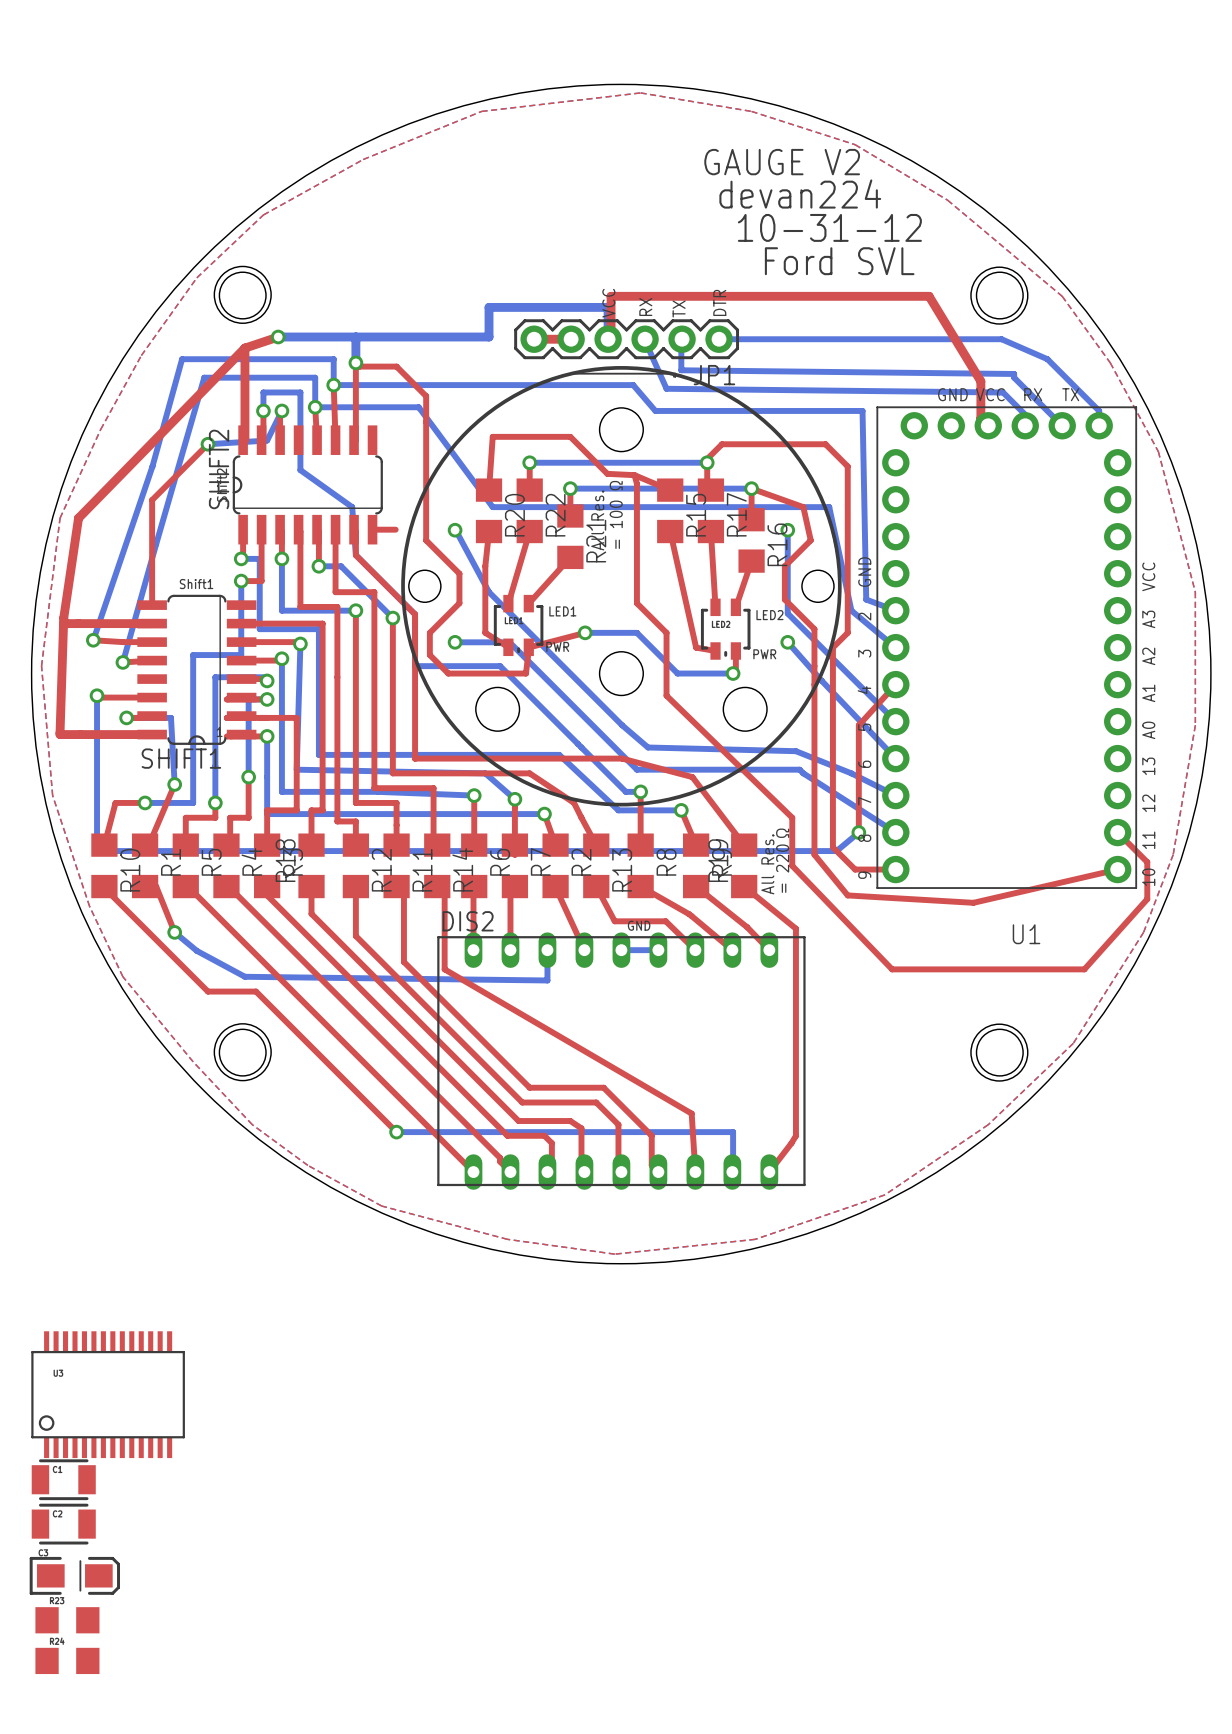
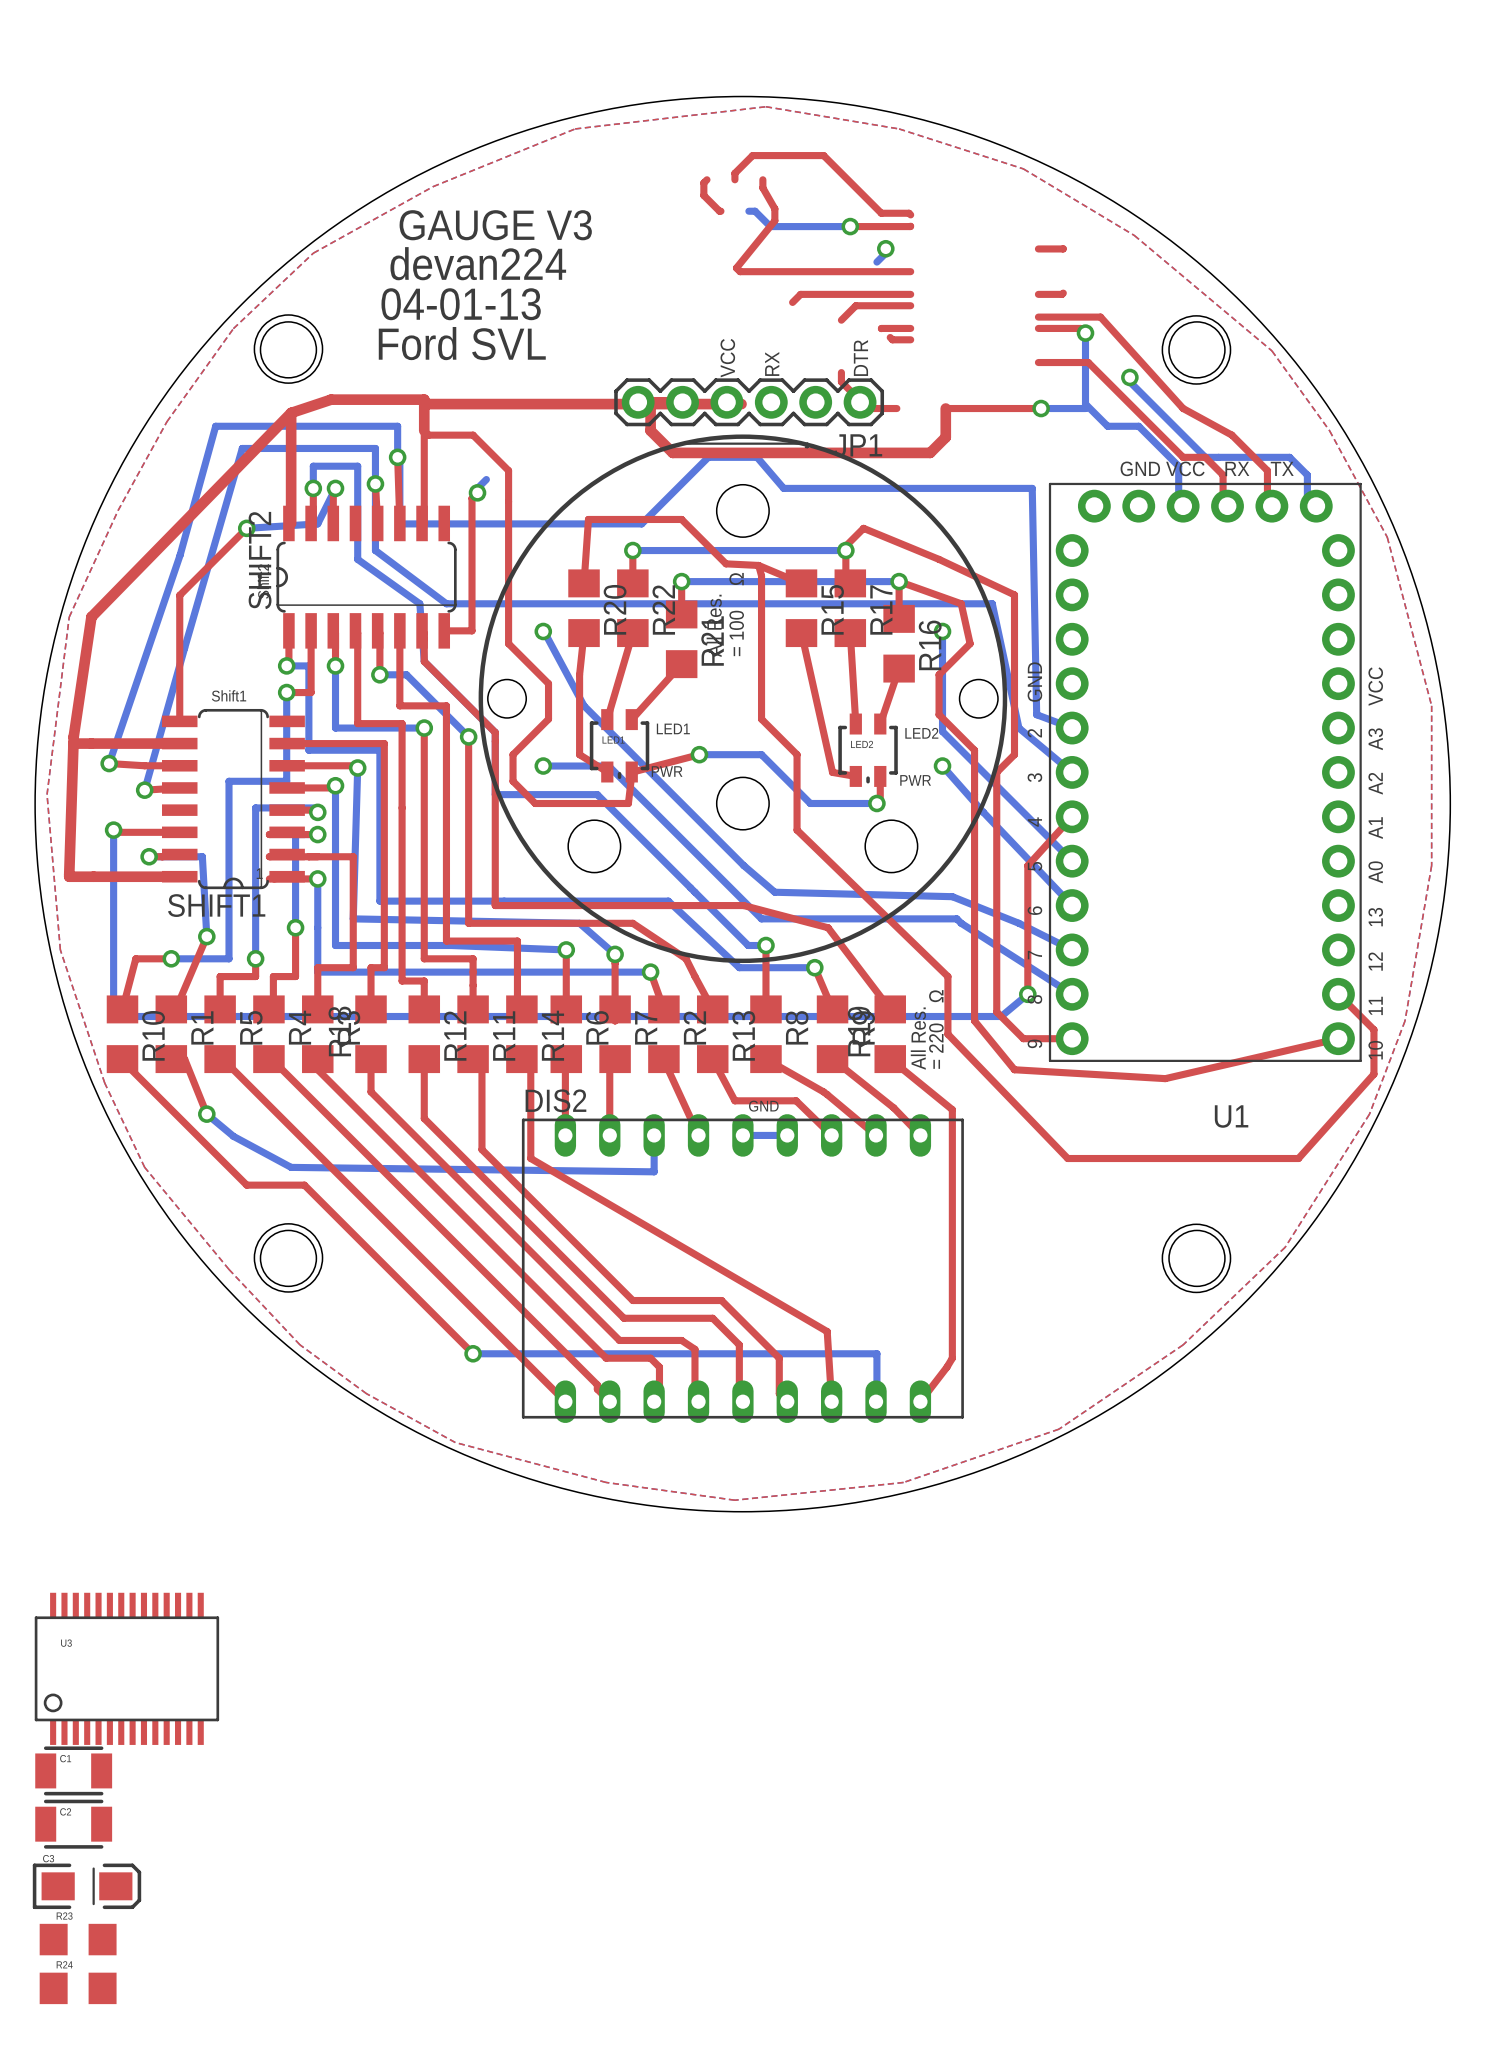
top track: none -> (706, 179) (703, 182) (703, 195) (720, 211)
top track: none -> (734, 179) (734, 173) (752, 155) (823, 155) (881, 213) (909, 213) (910, 214)
top track: none -> (762, 179) (762, 187) (774, 208) (774, 220) (736, 268) (740, 271) (910, 271)
text: GAUGE V2 (782, 162) -> none
bottom track: none -> (748, 211) (755, 211) (770, 226) (850, 226)
text: none -> GAUGE V3 (495, 225)
via: none -> (850, 226)
top track: none -> (910, 226) (850, 226)
text: devan224 (800, 194) -> none
bottom track: none -> (885, 248) (885, 253) (876, 262)
via: none -> (885, 248)
top track: none -> (1038, 248) (1063, 248)
text: none -> devan224 (478, 263)
text: 10-31-12 (829, 227) -> none
top track: none -> (1063, 293) (1038, 294)
top track: none -> (910, 294) (800, 294) (792, 302)
text: none -> 04-01-13 (461, 304)
top track: none -> (910, 305) (855, 305) (841, 320)
text: Ford SVL (839, 261) -> none
top track: none -> (1038, 317) (1100, 317) (1183, 408) (1231, 435) (1267, 470) (1267, 501) (1271, 506)
top track: none -> (881, 328) (910, 328)
top track: none -> (1038, 328) (1080, 328) (1085, 333)
bottom track: none -> (1085, 333) (1085, 408) (1041, 408)
via: none -> (1085, 333)
top track: none -> (890, 337) (892, 339) (910, 339)
text: none -> Ford SVL (462, 343)
top track: none -> (1038, 362) (1088, 362) (1183, 457) (1205, 457) (1223, 475) (1223, 501) (1227, 506)
text: TX (679, 309) -> none
top track: none -> (841, 372) (841, 381) (868, 408) (896, 408)
via: none -> (1129, 377)
top track: none -> (331, 399) (424, 399) (424, 430)
bottom track: (278, 337) (489, 337) (489, 307) (608, 307) (608, 339) -> none
via: (278, 337) -> none
bottom track: (355, 337) (355, 362) -> none
top track: (608, 339) (611, 339) (611, 296) (929, 296) (980, 381) (980, 418) (988, 425) -> none
bottom track: (645, 339) (666, 388) (1003, 392) (1028, 418) (1028, 422) (1025, 425) -> none
bottom track: (682, 339) (681, 370) (1014, 373) (1014, 377) (1062, 425) -> none
bottom track: (719, 339) (1001, 339) (1047, 359) (1099, 410) (1099, 425) -> (1129, 377) (1129, 381) (1205, 457) (1289, 457) (1307, 475) (1307, 497) (1316, 506)
top track: none -> (424, 404) (741, 404)
top track: none -> (650, 404) (650, 430) (672, 452) (930, 452) (945, 437) (945, 408) (1041, 408)
bottom track: none -> (1085, 404) (1107, 426) (1138, 426) (1178, 466) (1178, 501) (1183, 506)
via: none -> (1041, 408)
via position: (355, 362) -> (477, 492)
bottom track: (333, 385) (592, 385) -> (397, 457) (399, 459) (400, 523) (641, 523) (708, 457)
bottom track: none -> (486, 479) (477, 488) (477, 492)
bottom track: (315, 407) (418, 407) (492, 507) -> (375, 483) (375, 550) (446, 603) (588, 603)
top track: none -> (477, 492) (472, 498) (472, 630)
top track: (722, 444) (825, 444) (847, 466) (847, 499) -> (863, 528) (939, 559) (1014, 594)

